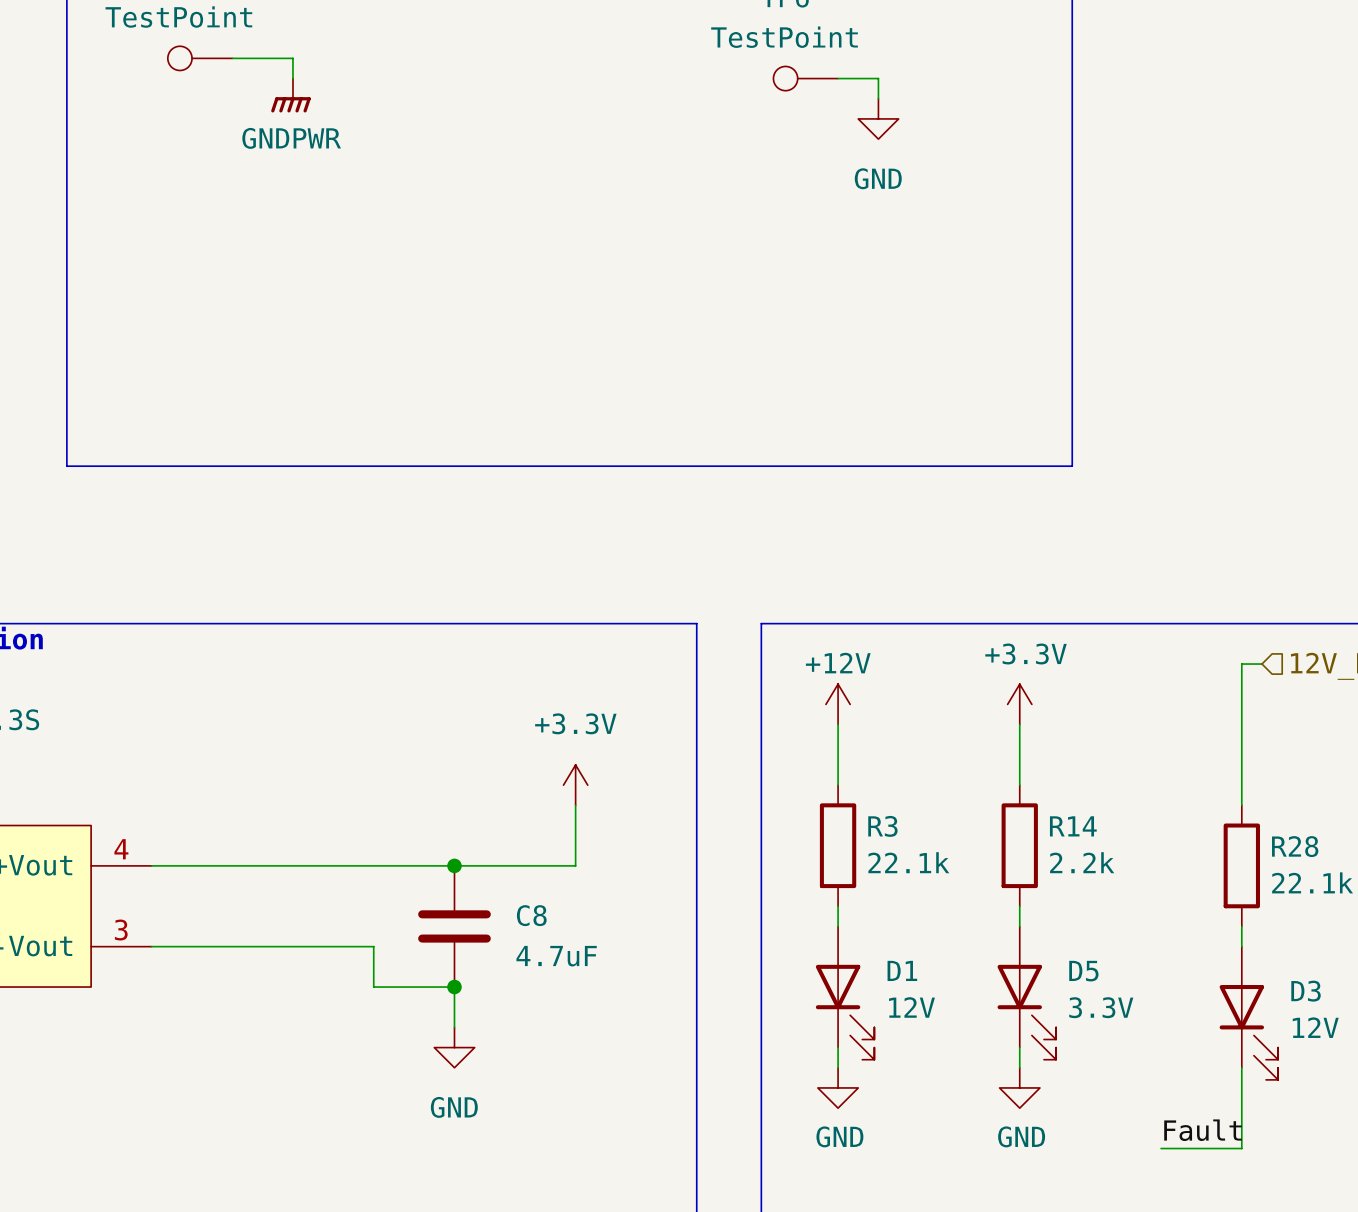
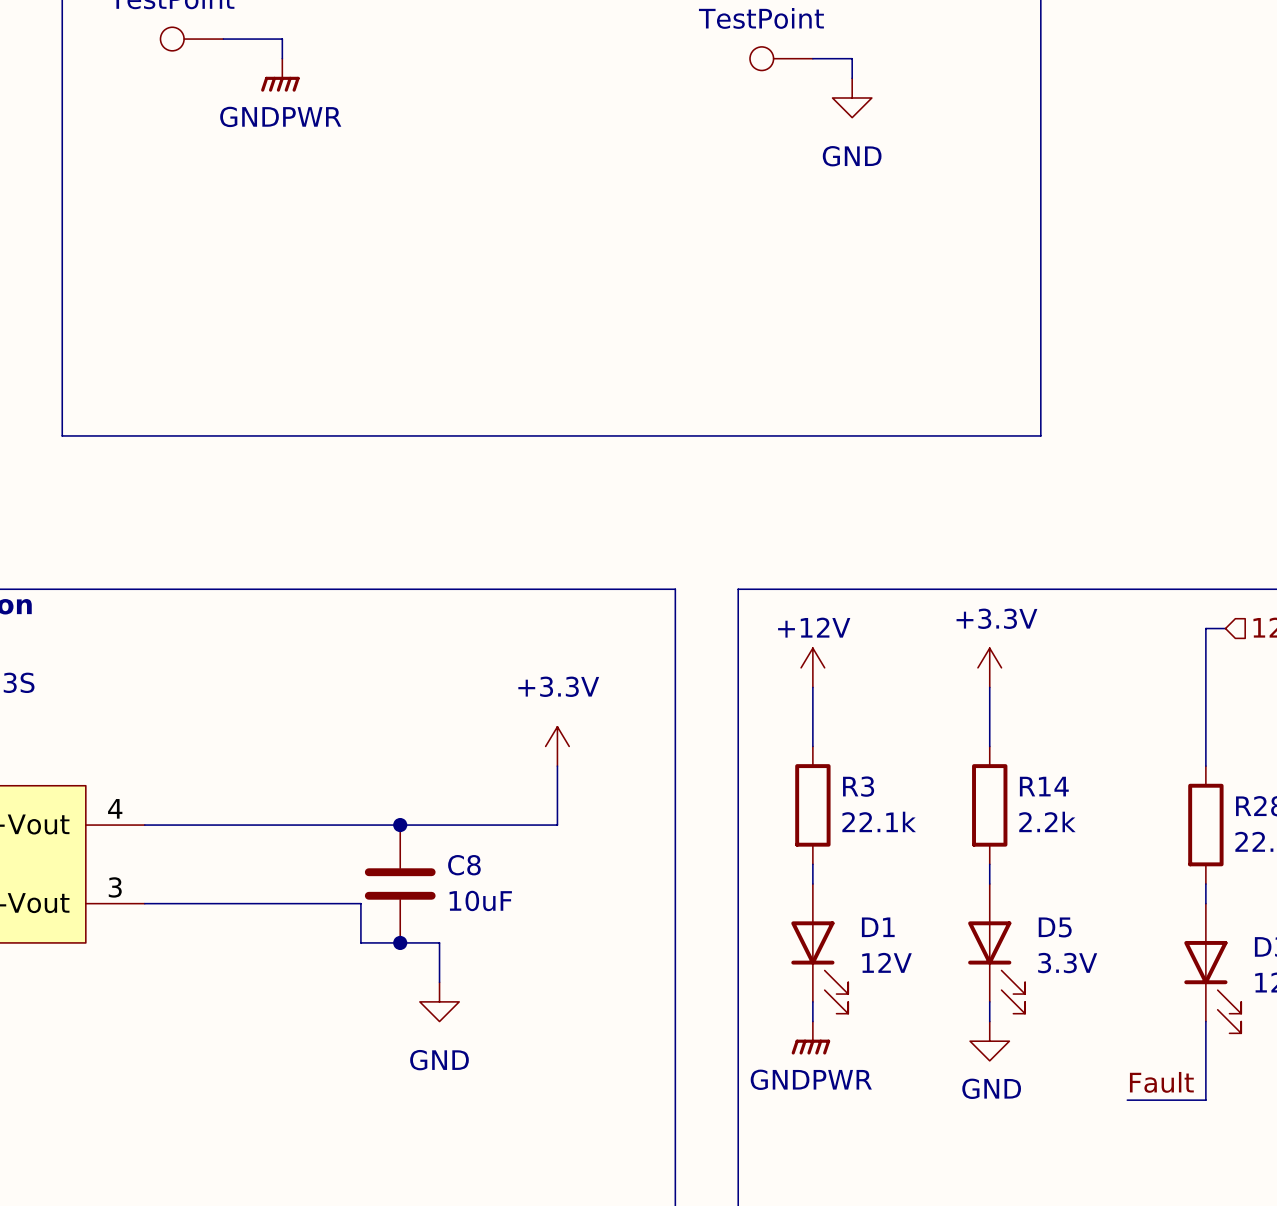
junction position: (454, 865) -> (400, 825)
C8 name position: C8 (531, 915) -> C8 (464, 865)
C8 position: (454, 926) -> (400, 884)
C8 value: 4.7uF (556, 956) -> 10uF (480, 900)
junction position: (454, 987) -> (400, 942)
power symbol: GND (838, 1087) -> GNDPWR (810, 1038)

